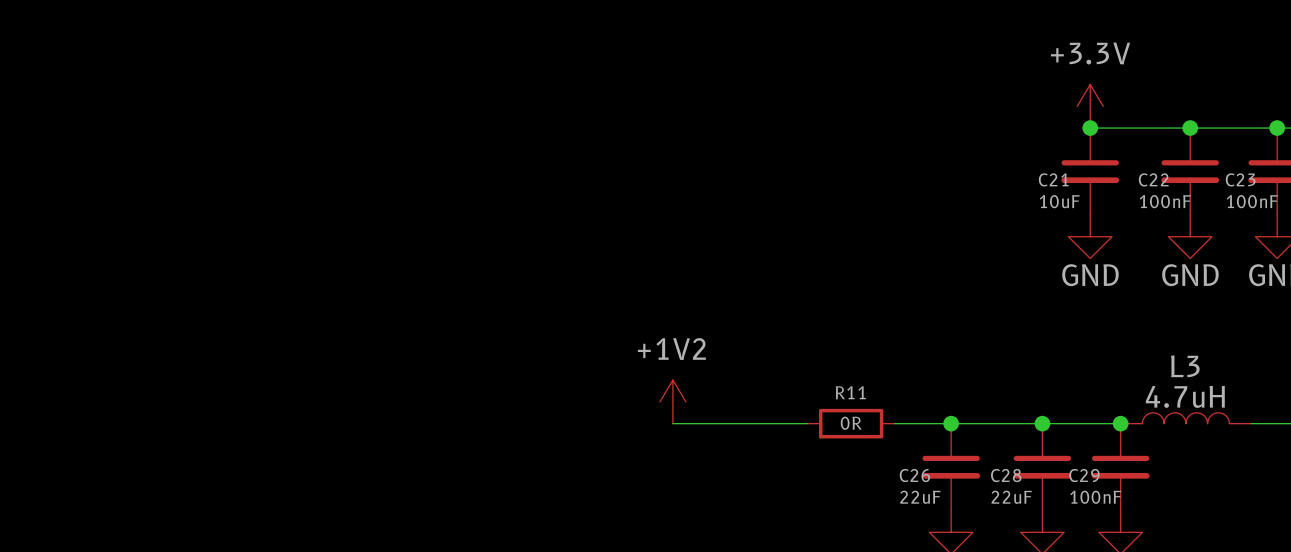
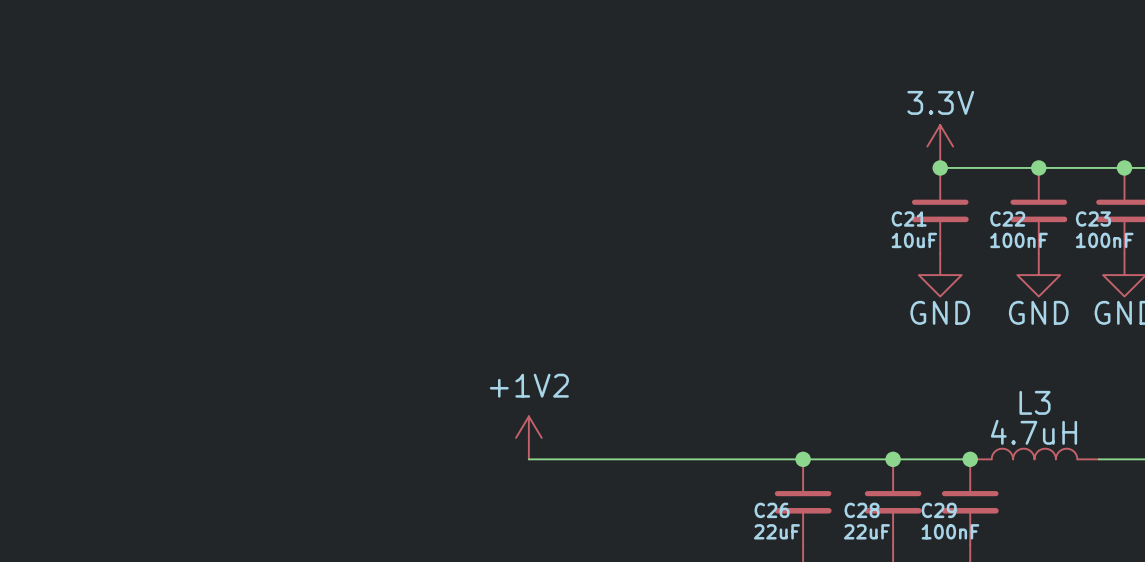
power symbol: +3.3V (1090, 106) -> 3.3V (940, 146)
wire: none -> (661, 459) (747, 459)
R11: 0R (851, 423) -> none

